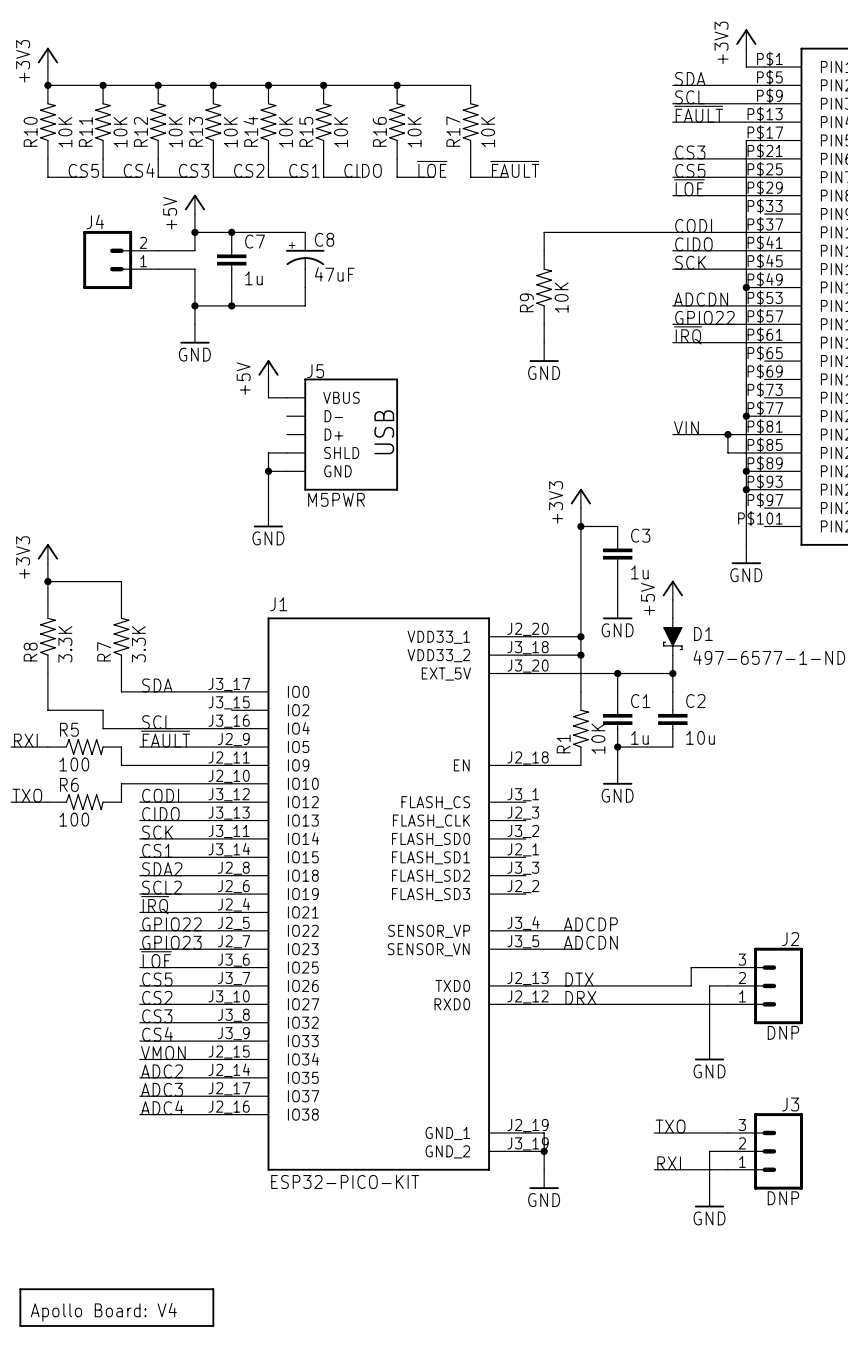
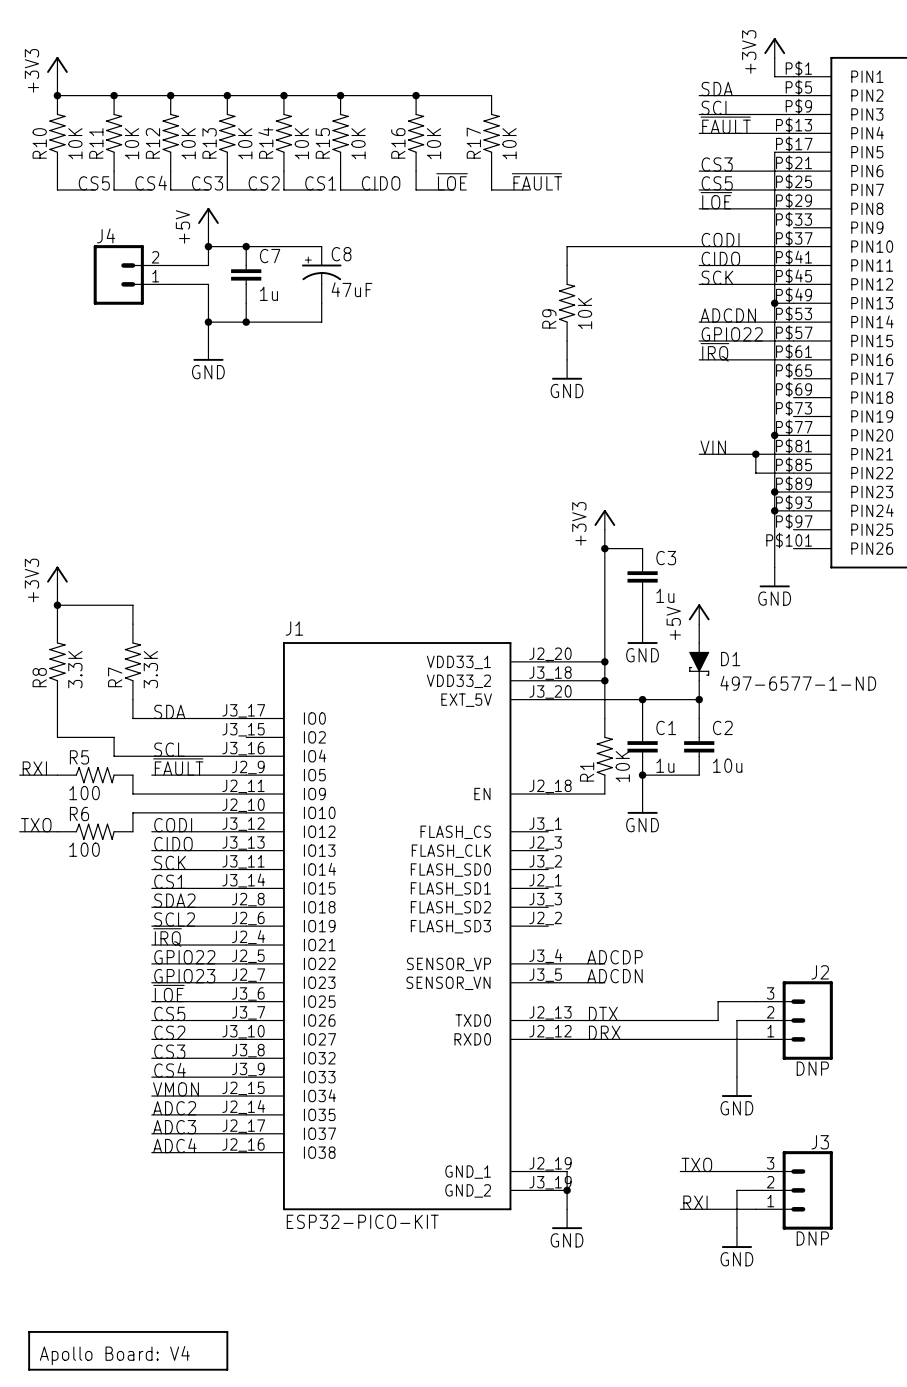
power symbol: +5V (268, 369) -> none
wire: (268, 379) (268, 397) (286, 397) -> none
J5: M5PWR (342, 434) -> none
wire: (286, 452) (268, 452) (268, 508) -> none
wire: (268, 471) (286, 471) -> none
junction: (268, 471) -> none
power symbol: GND (268, 517) -> none

